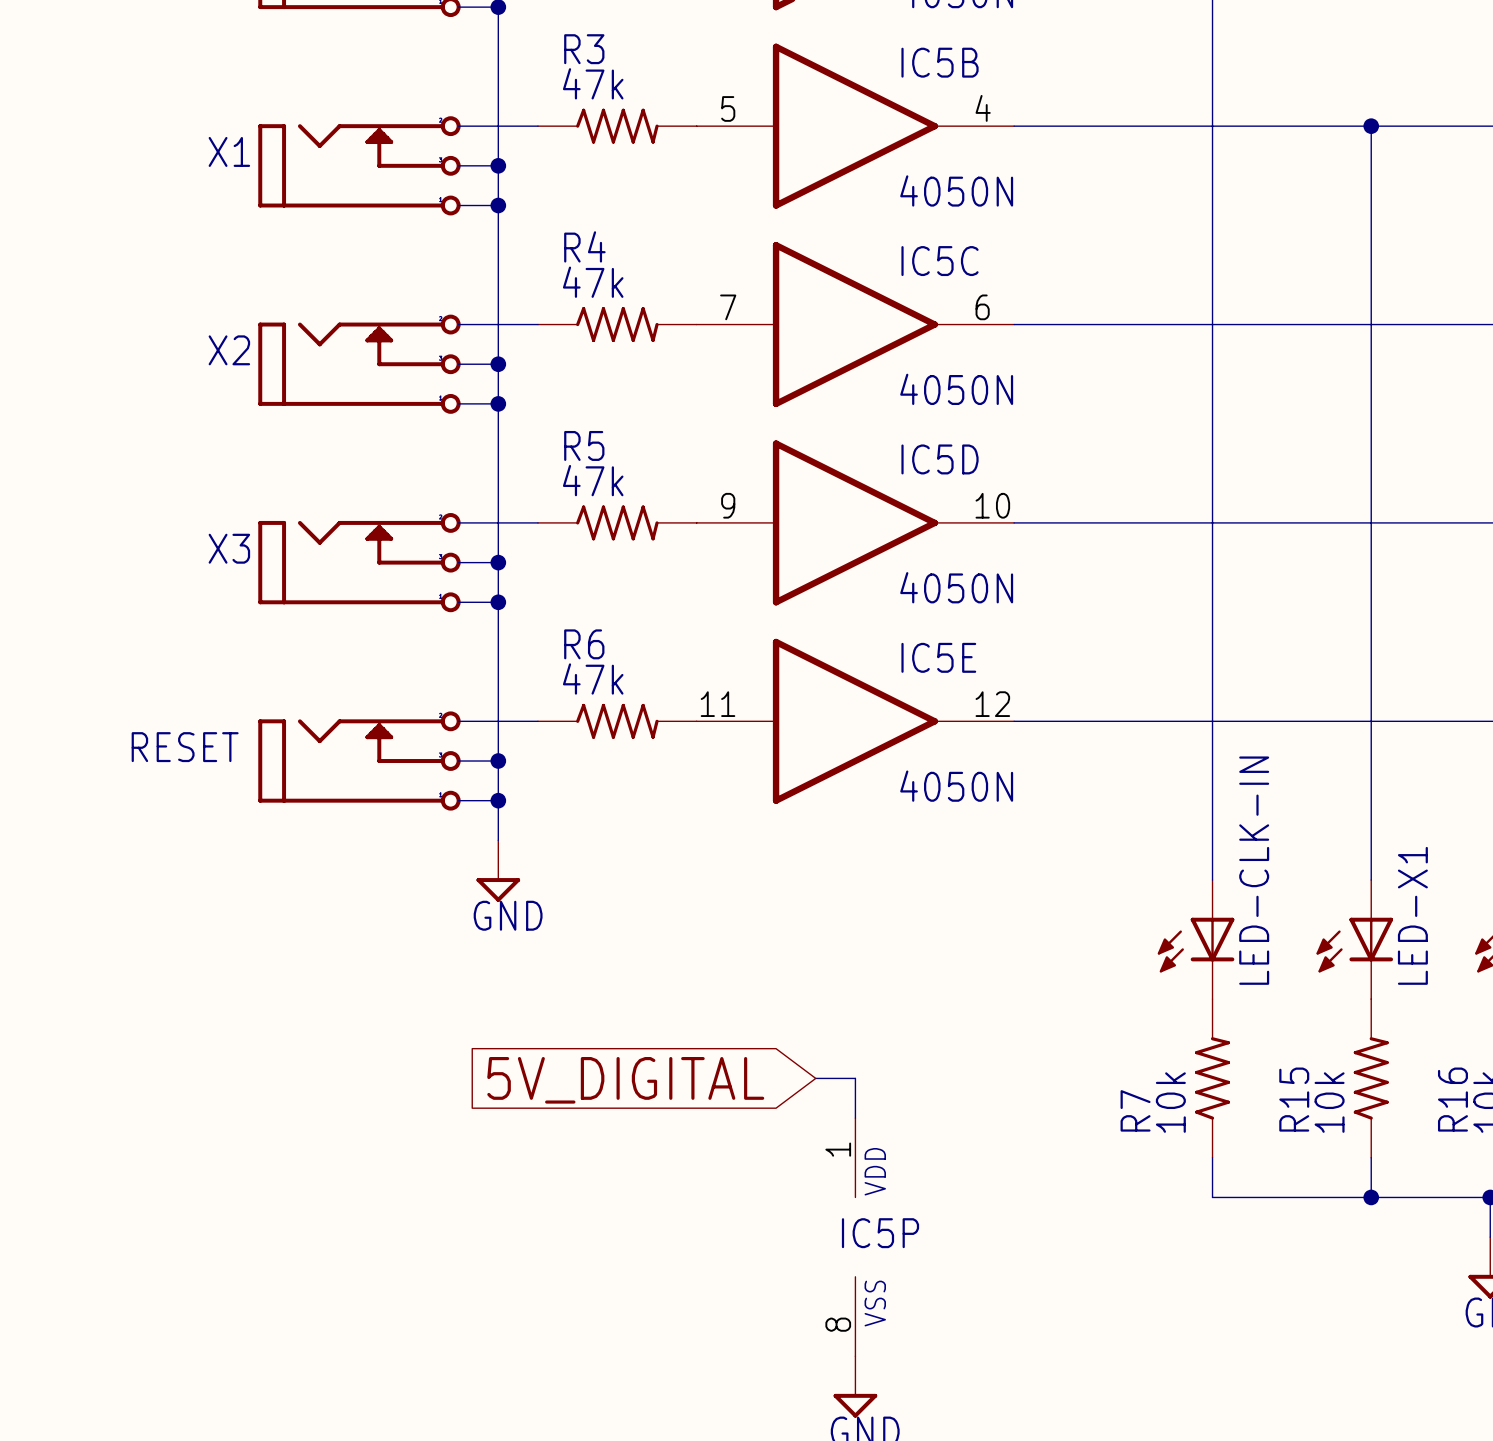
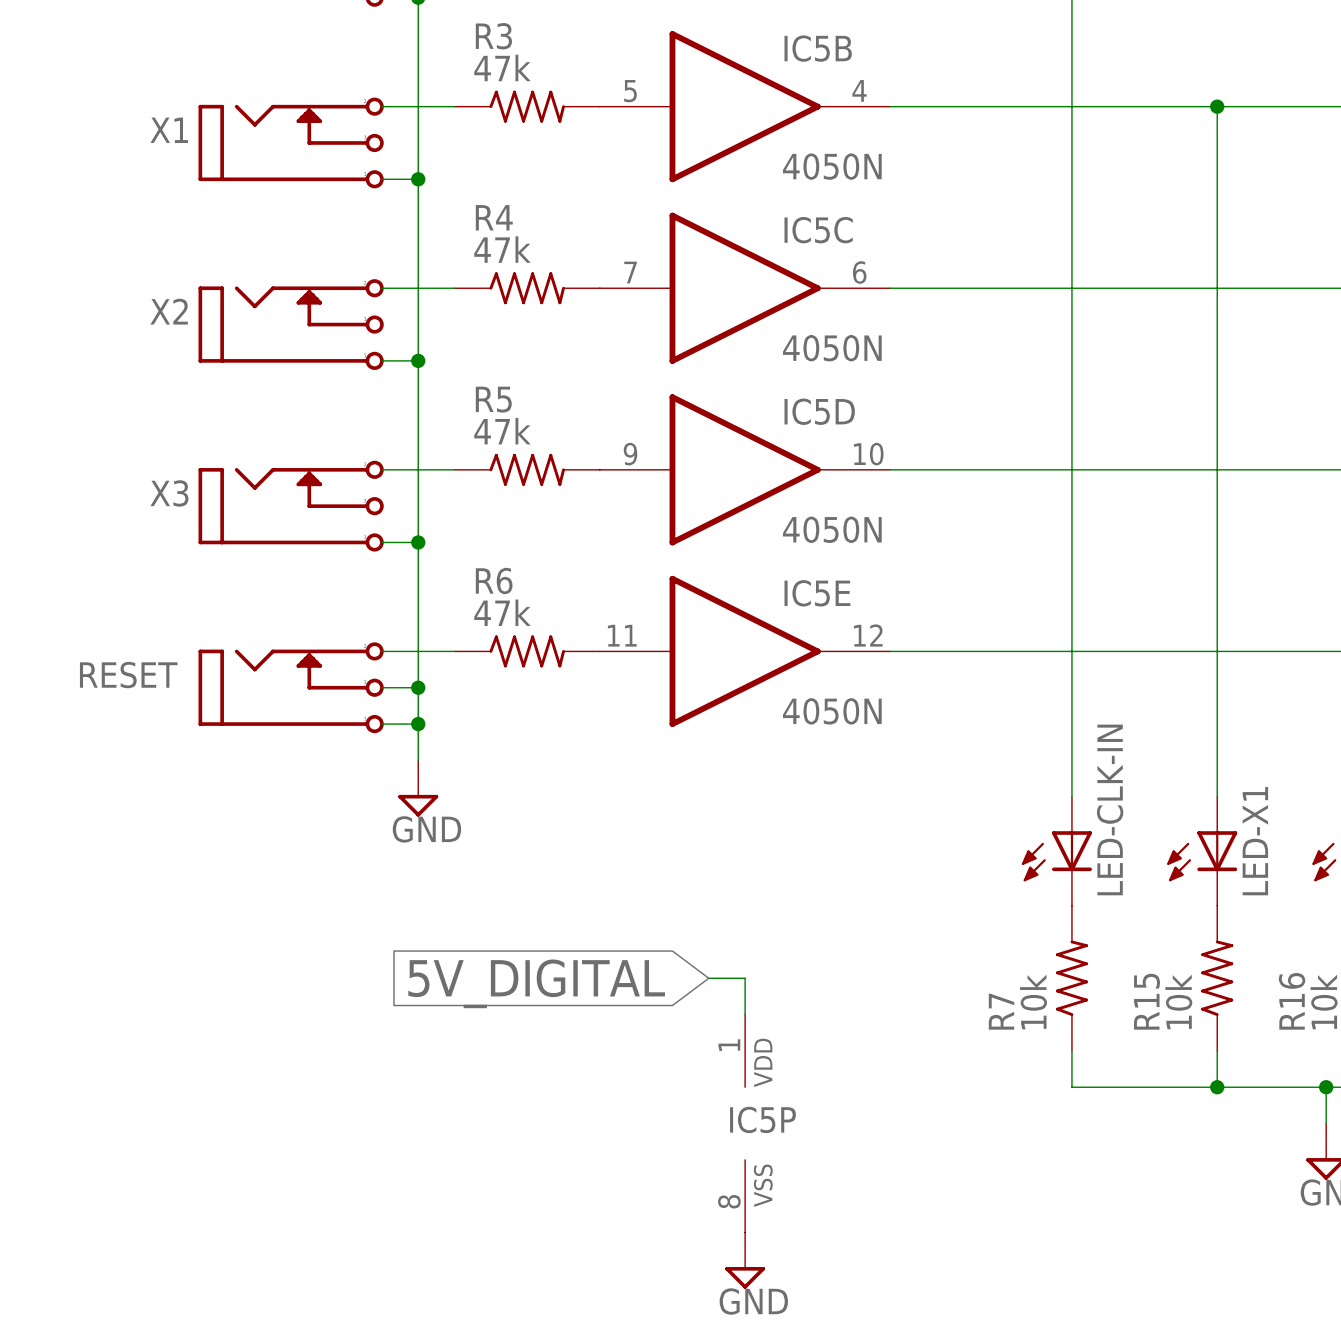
wire: (458, 165) (498, 165) -> none
junction: (498, 165) -> none
wire: (458, 364) (498, 364) -> none
junction: (498, 364) -> none
wire: (458, 562) (498, 562) -> none
junction: (498, 562) -> none

